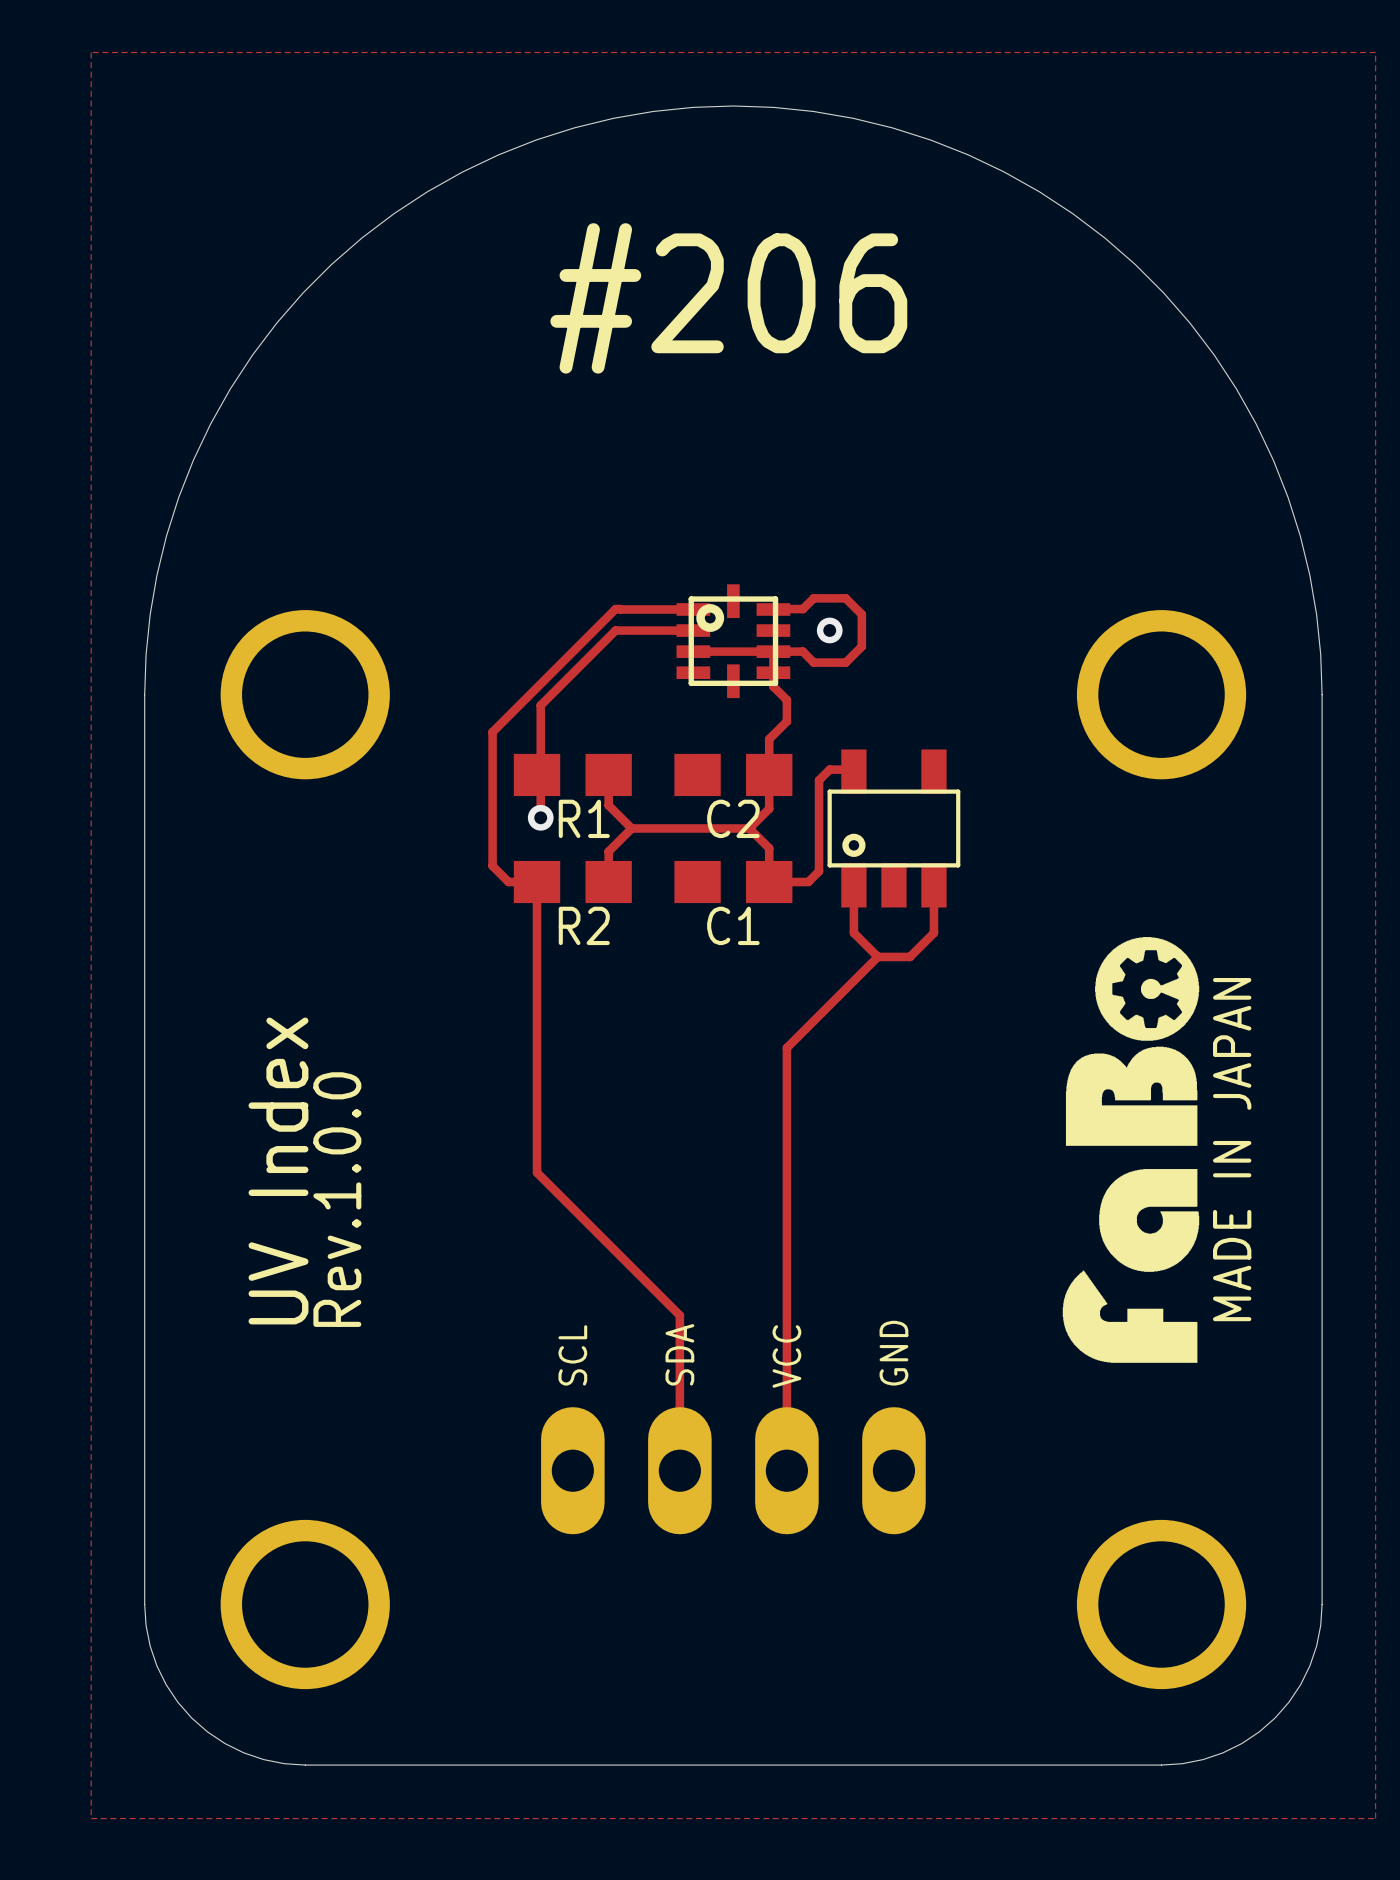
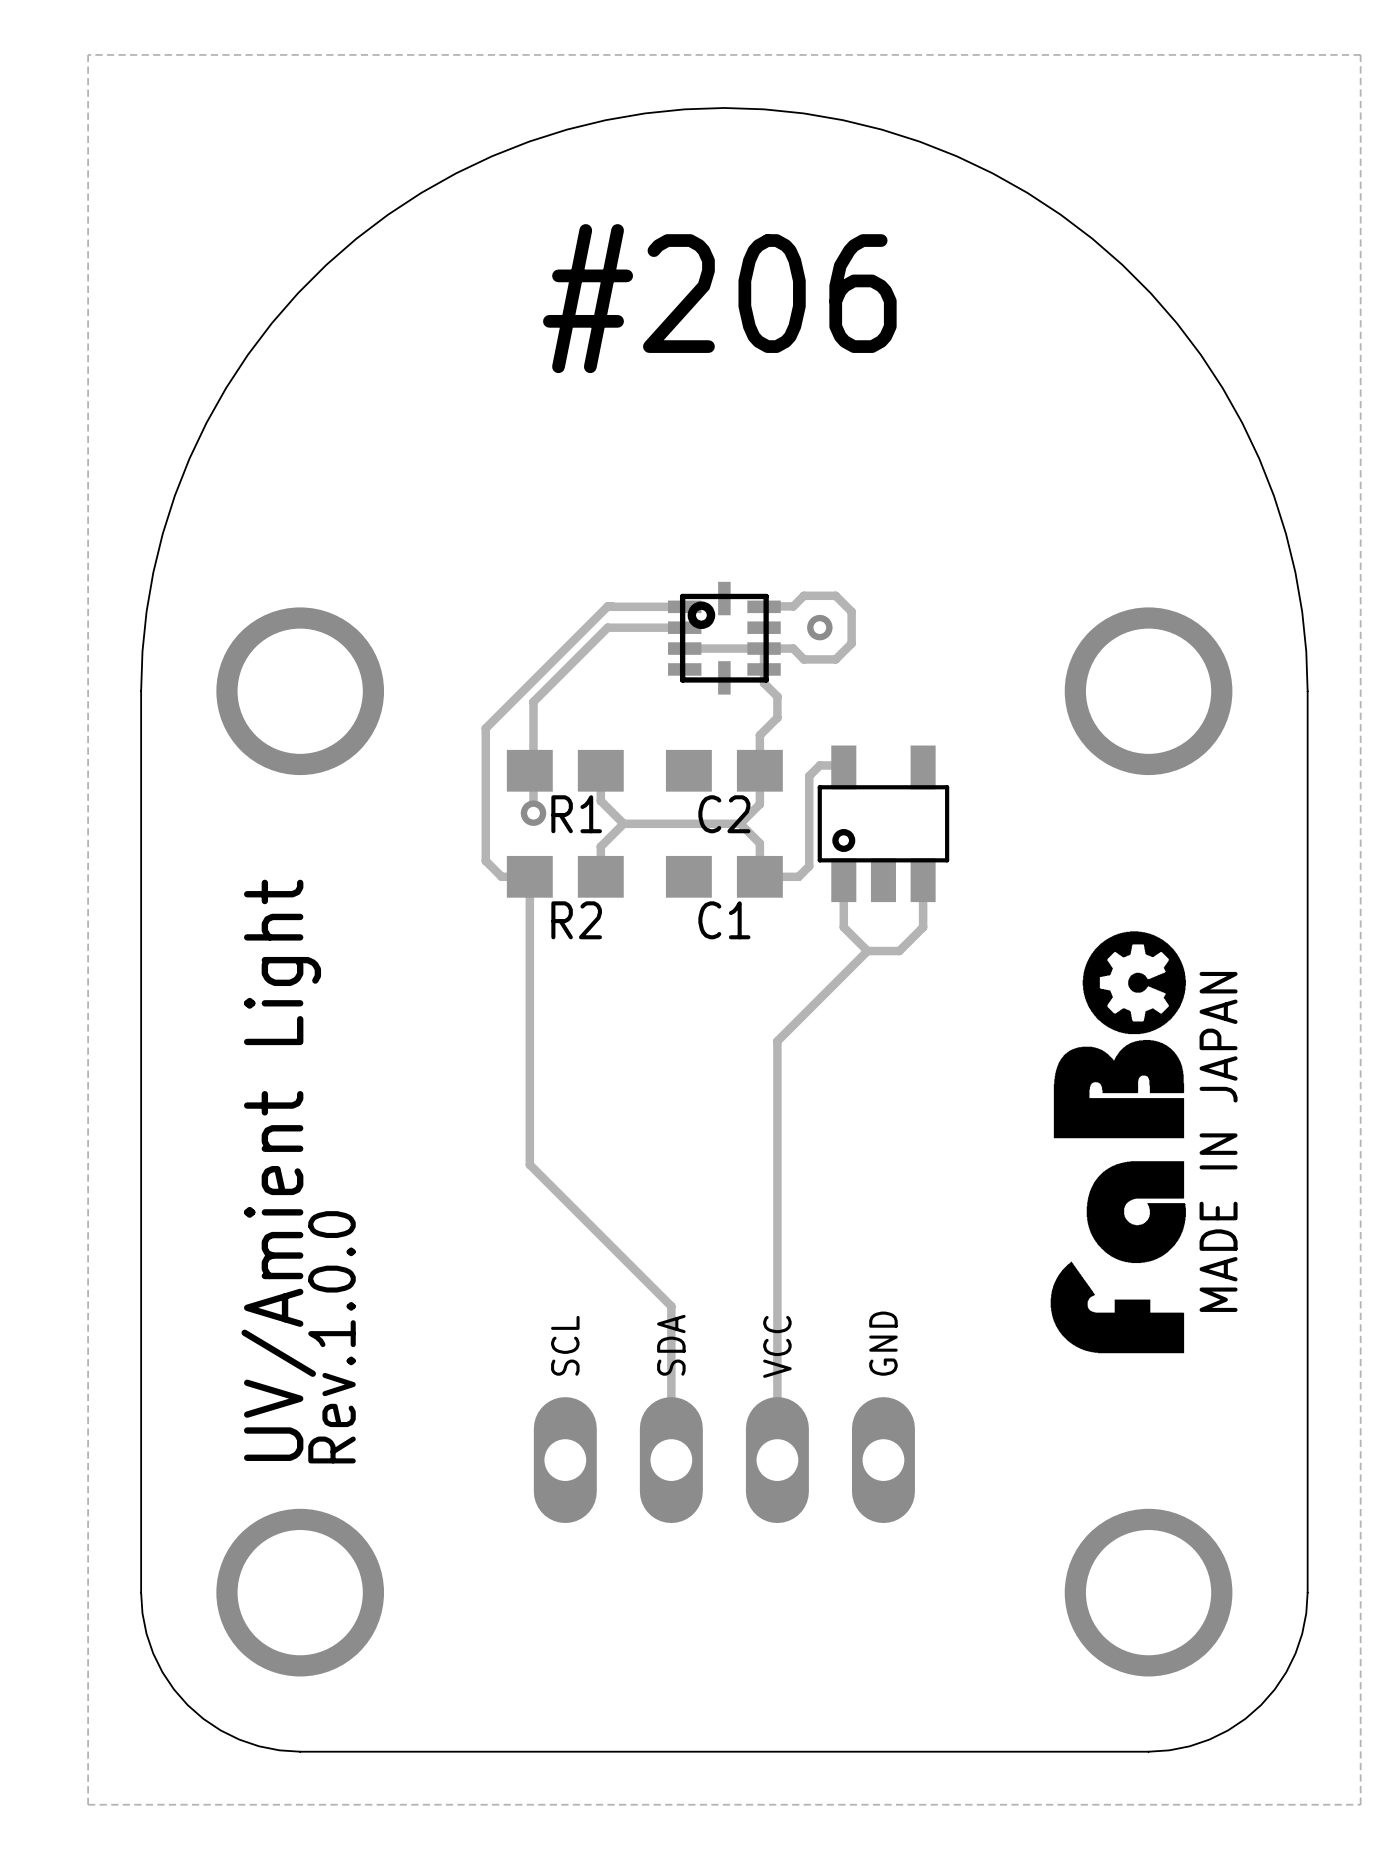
text: UV Index (278, 1170) -> none
text: none -> UV/Amient Light (281, 1170)
text position: Rev.1.0.0 (337, 1199) -> Rev.1.0.0 (332, 1337)

